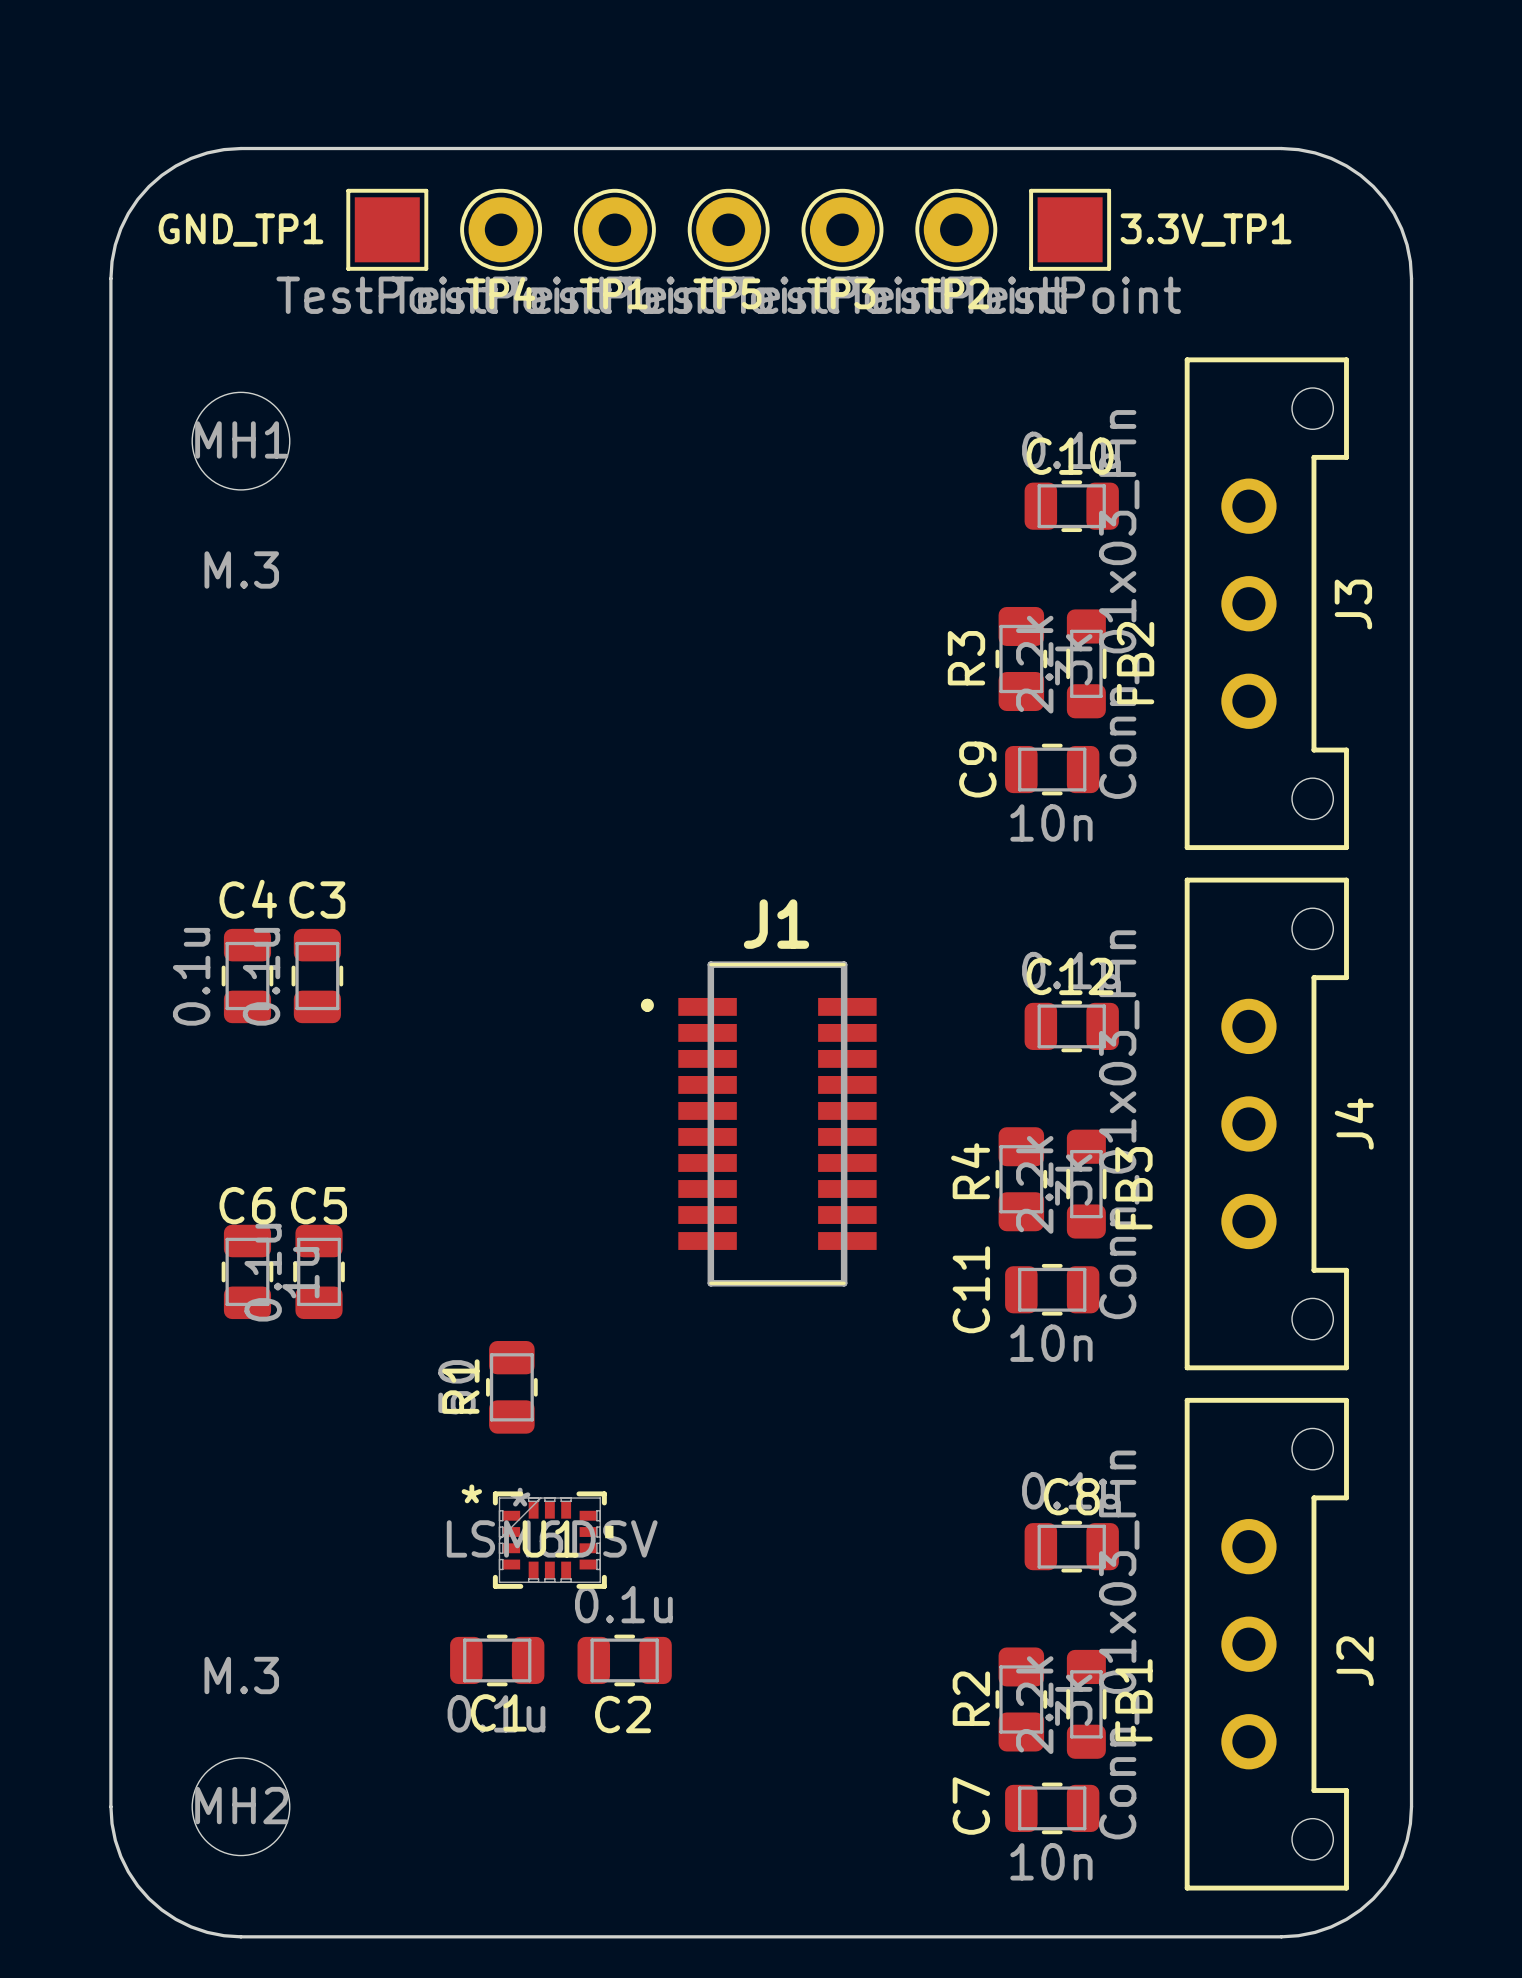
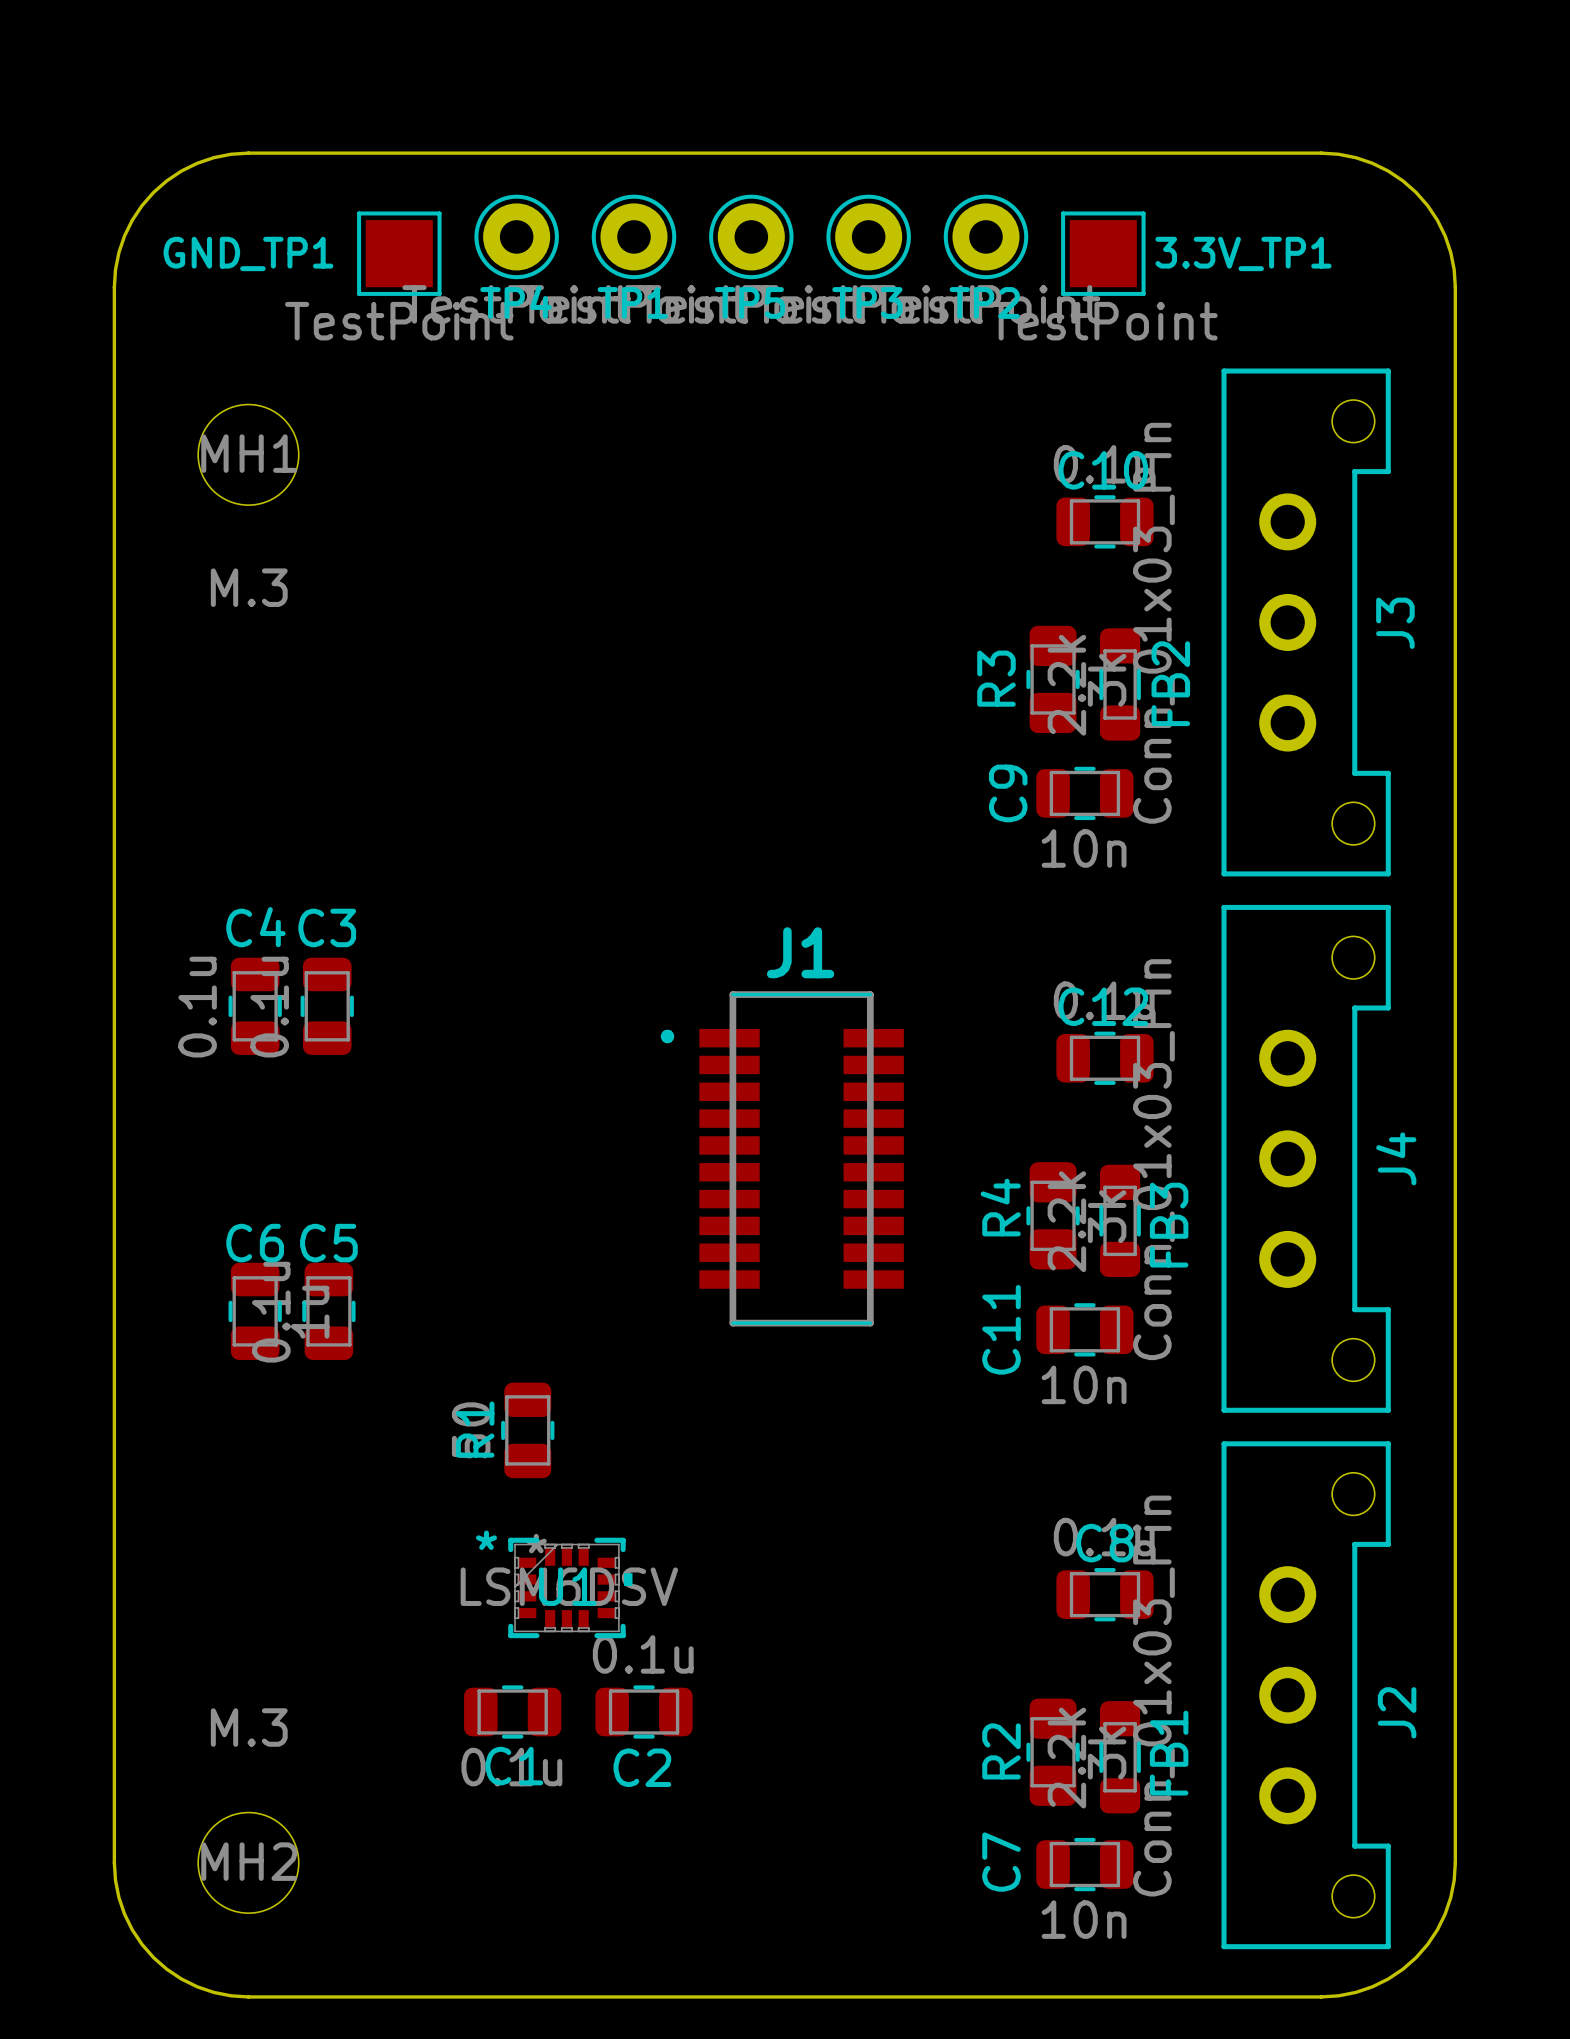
GND_TP1 position: (387, 229) -> (399, 253)
3.3V_TP1 position: (1070, 229) -> (1103, 253)

